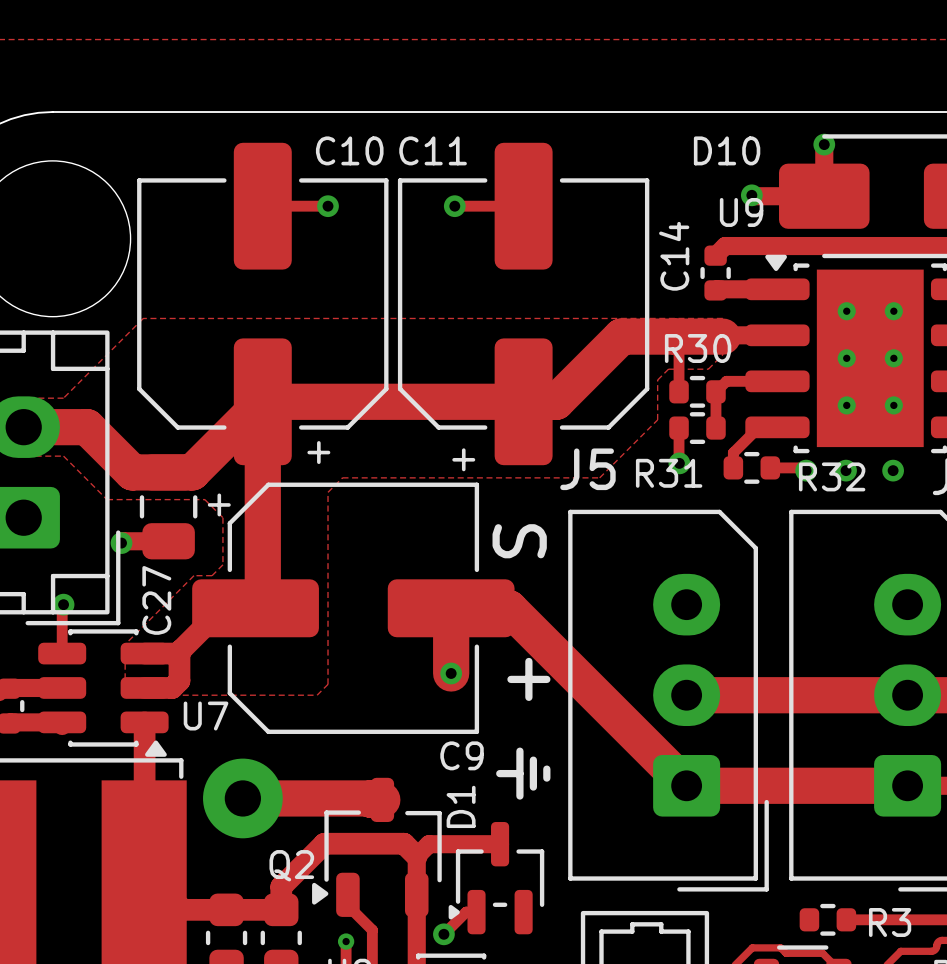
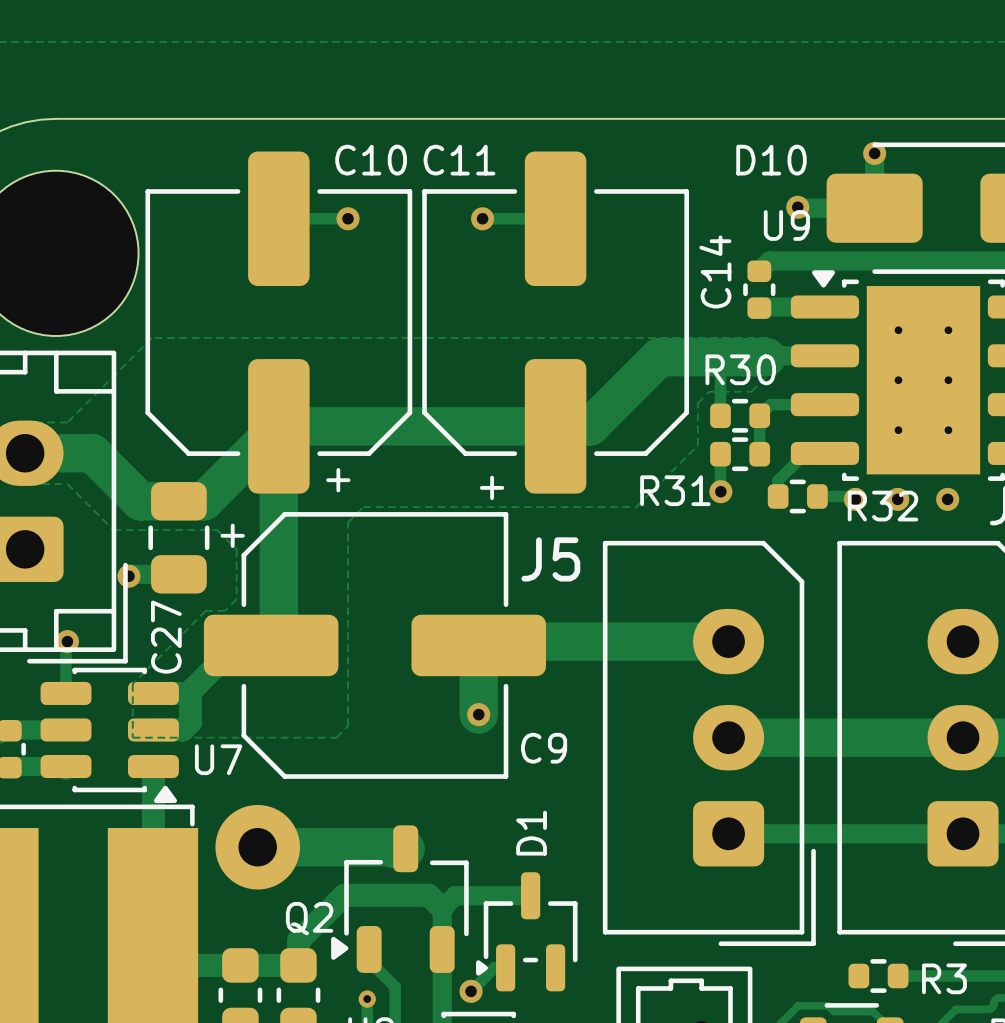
J5 name position: J5 (587, 469) -> J5 (550, 559)
R31 name position: R31 (669, 473) -> R31 (675, 490)
text: S (519, 541) -> none
track: (451, 608) (509, 608) (686, 785) -> (478, 645) (482, 641) (728, 641)
text: ⏚ + (523, 728) -> none
C9 name position: C9 (462, 755) -> C9 (544, 748)
track width: thick (686, 785) (907, 785) -> thin (728, 833) (963, 833)
D1 name position: D1 (461, 806) -> D1 (531, 833)

